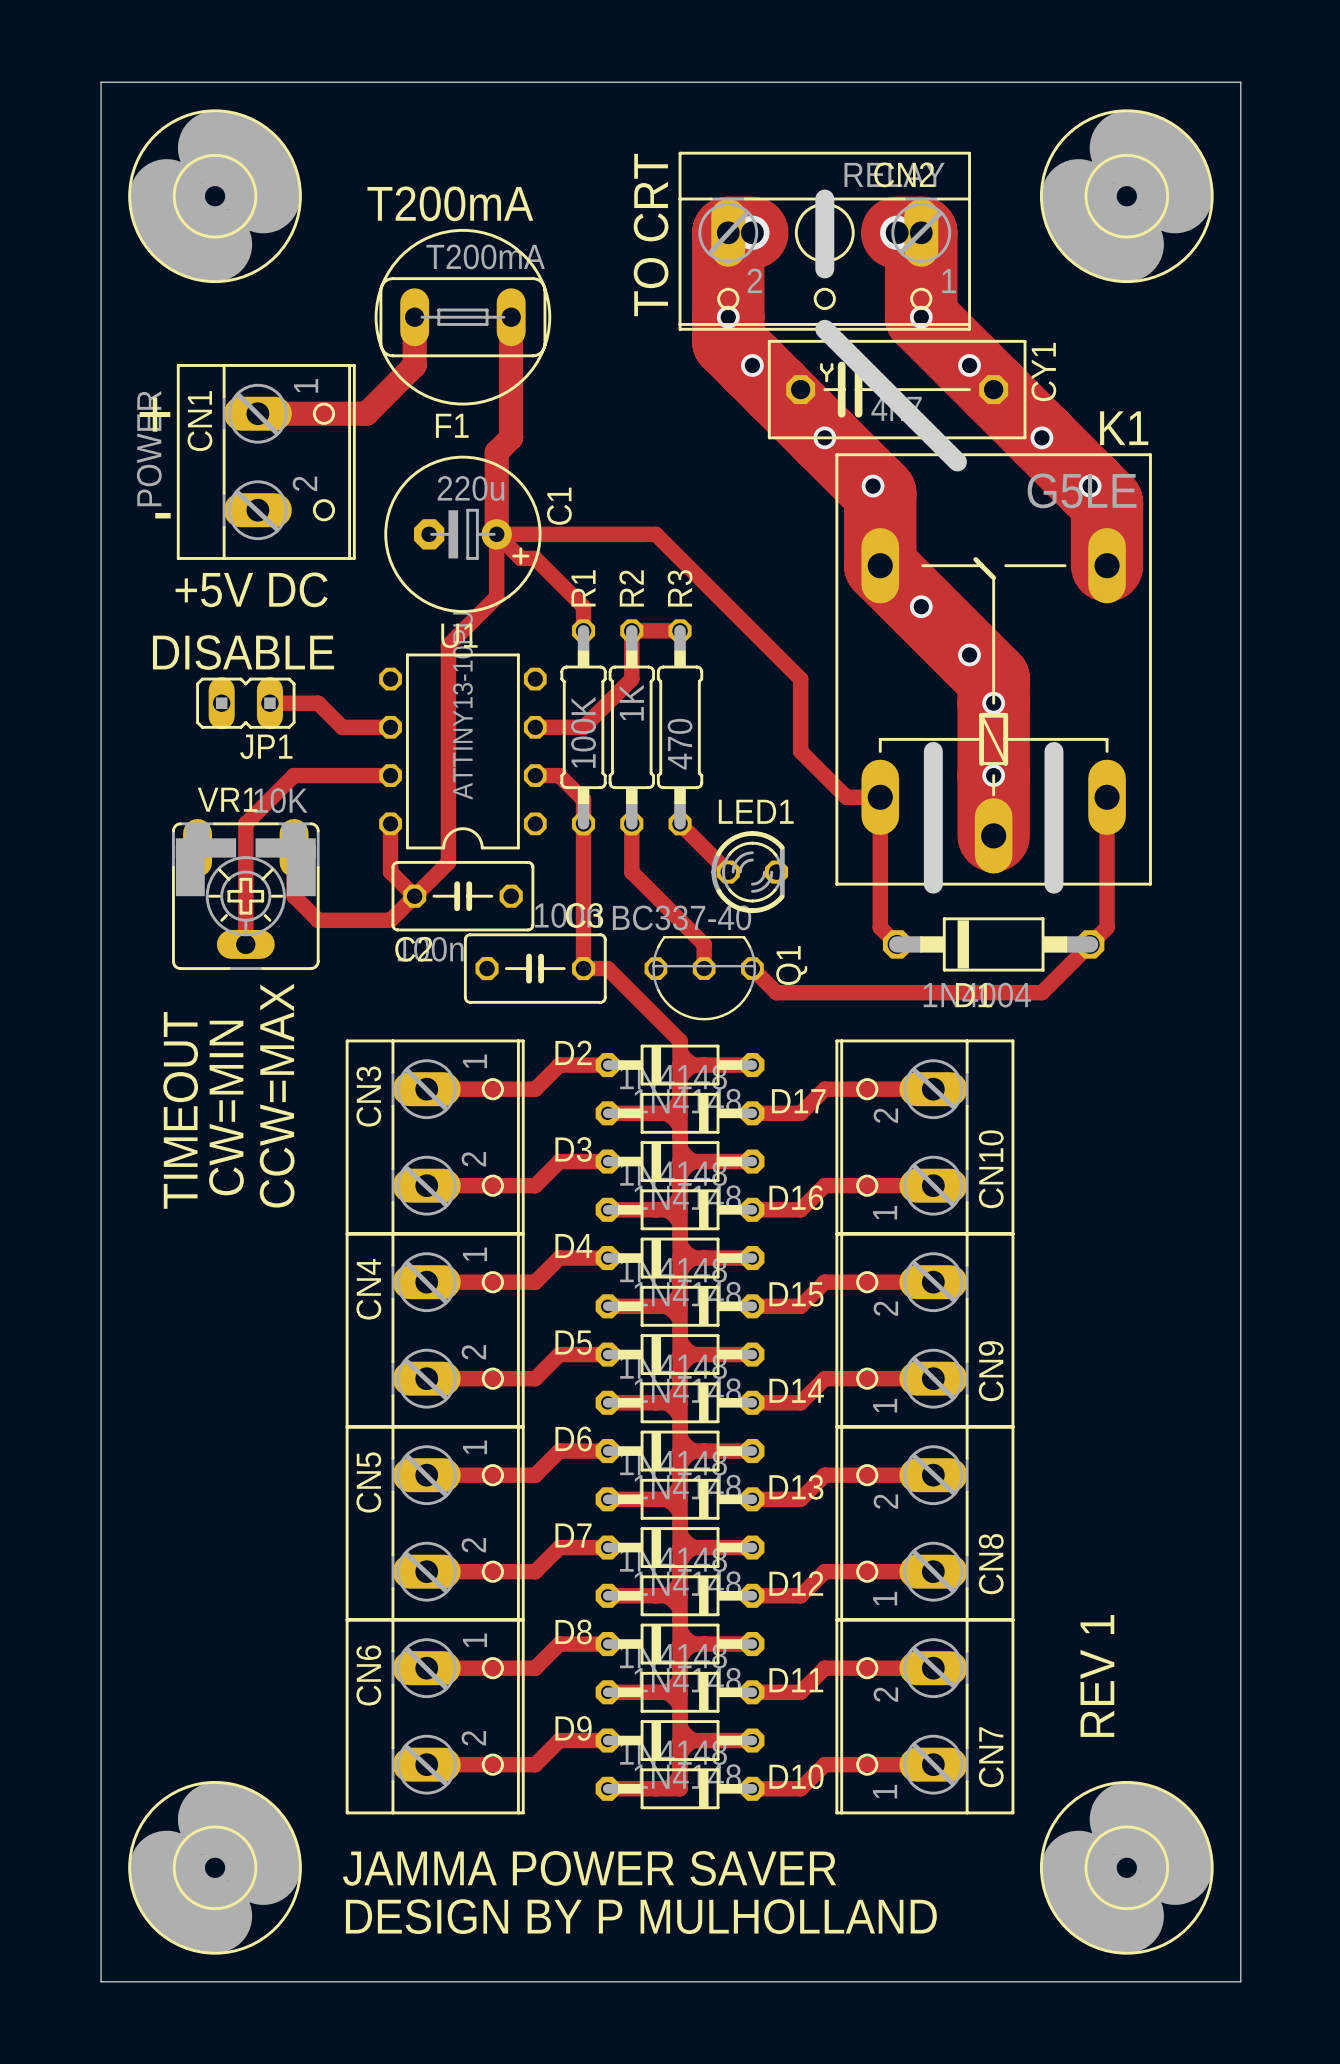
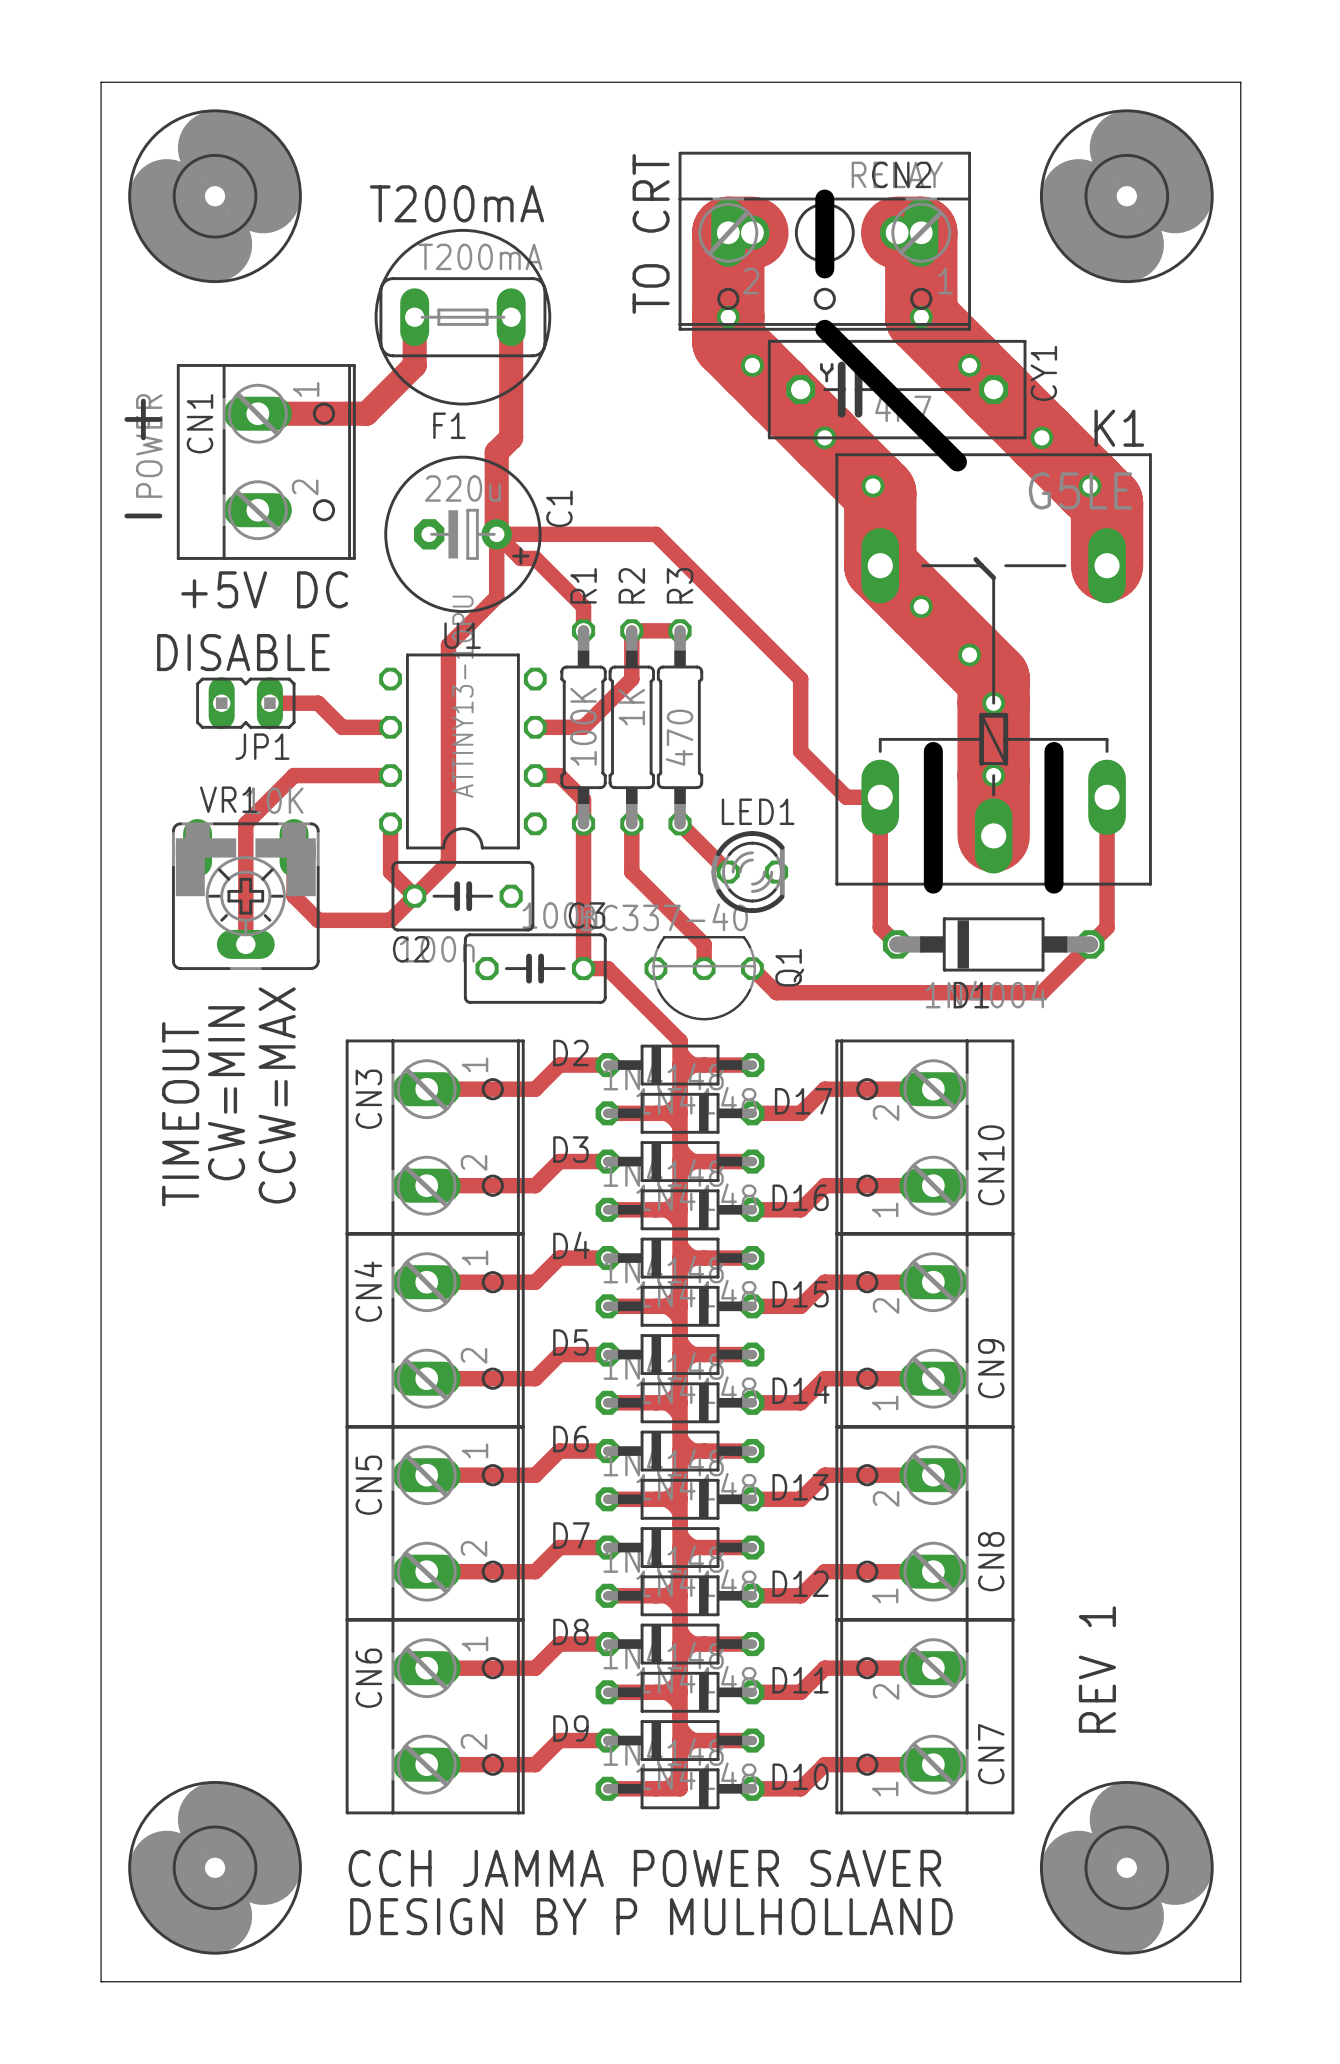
text: JAMMA POWER SAVER (589, 1868) -> CCH JAMMA POWER SAVER (644, 1868)

